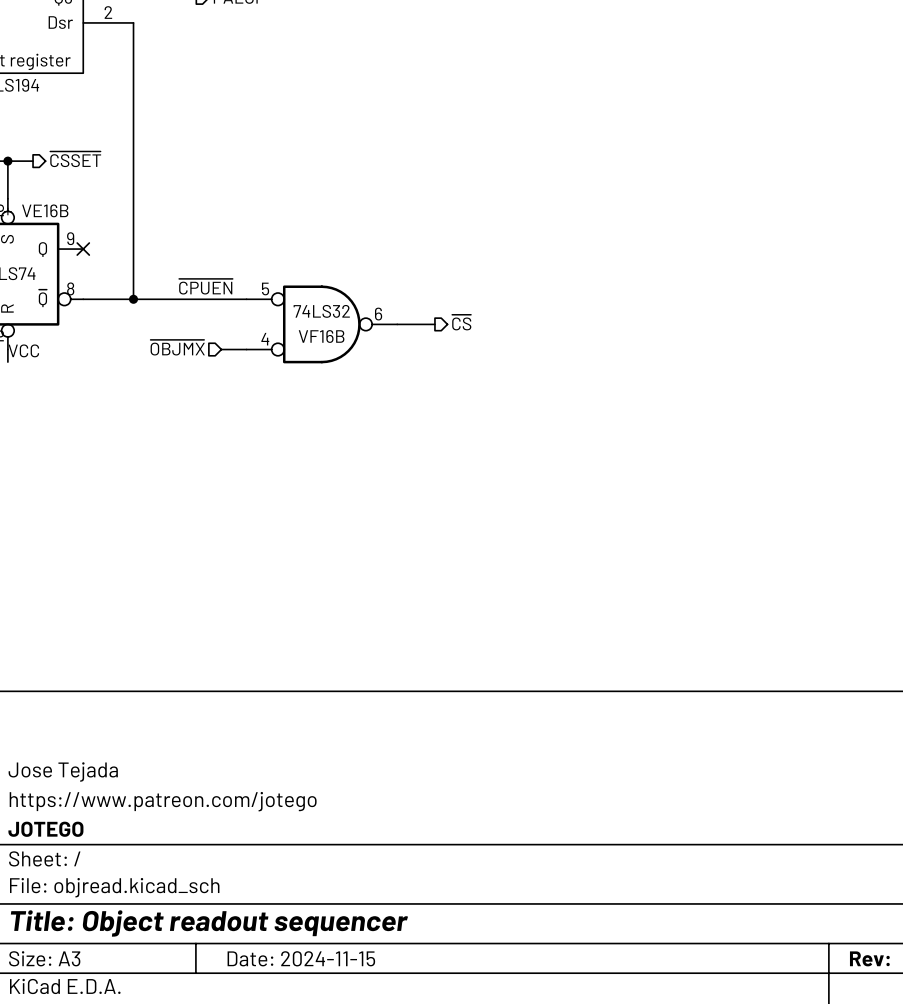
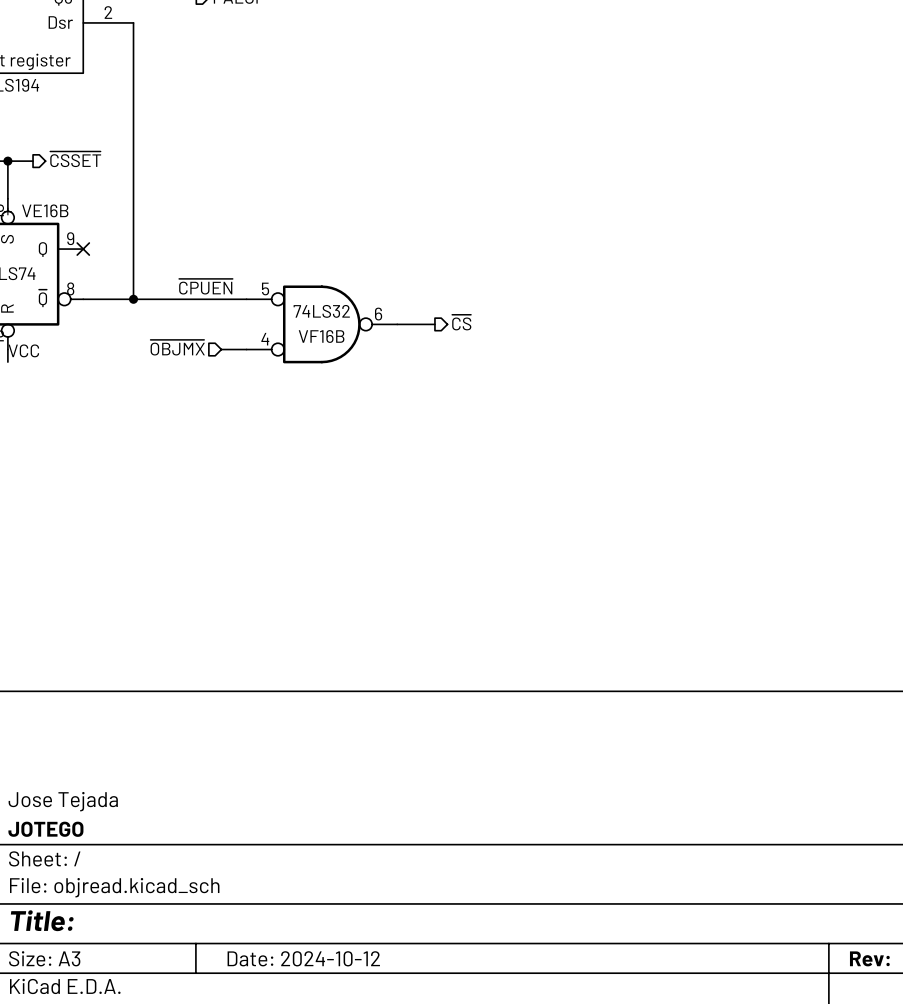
title block: Jose Tejada (63, 772) -> none
title block: https://www.patreon.com/jotego (163, 801) -> Jose Tejada (63, 801)
title block: Title: Object readout sequencer (209, 923) -> Title: (42, 920)
title block: Date: 2024-11-15 (301, 958) -> Date: 2024-10-12 (303, 958)

